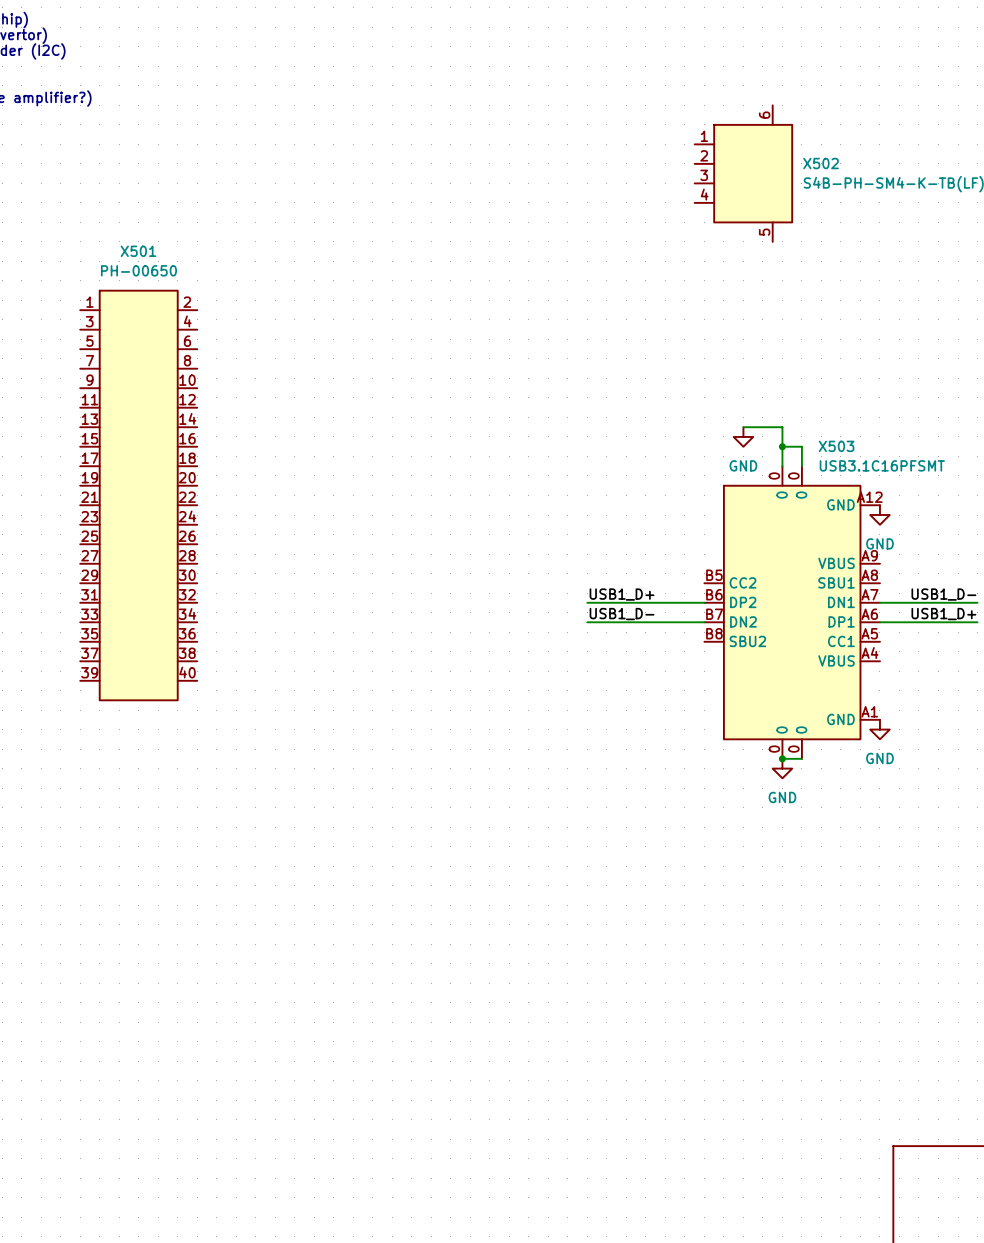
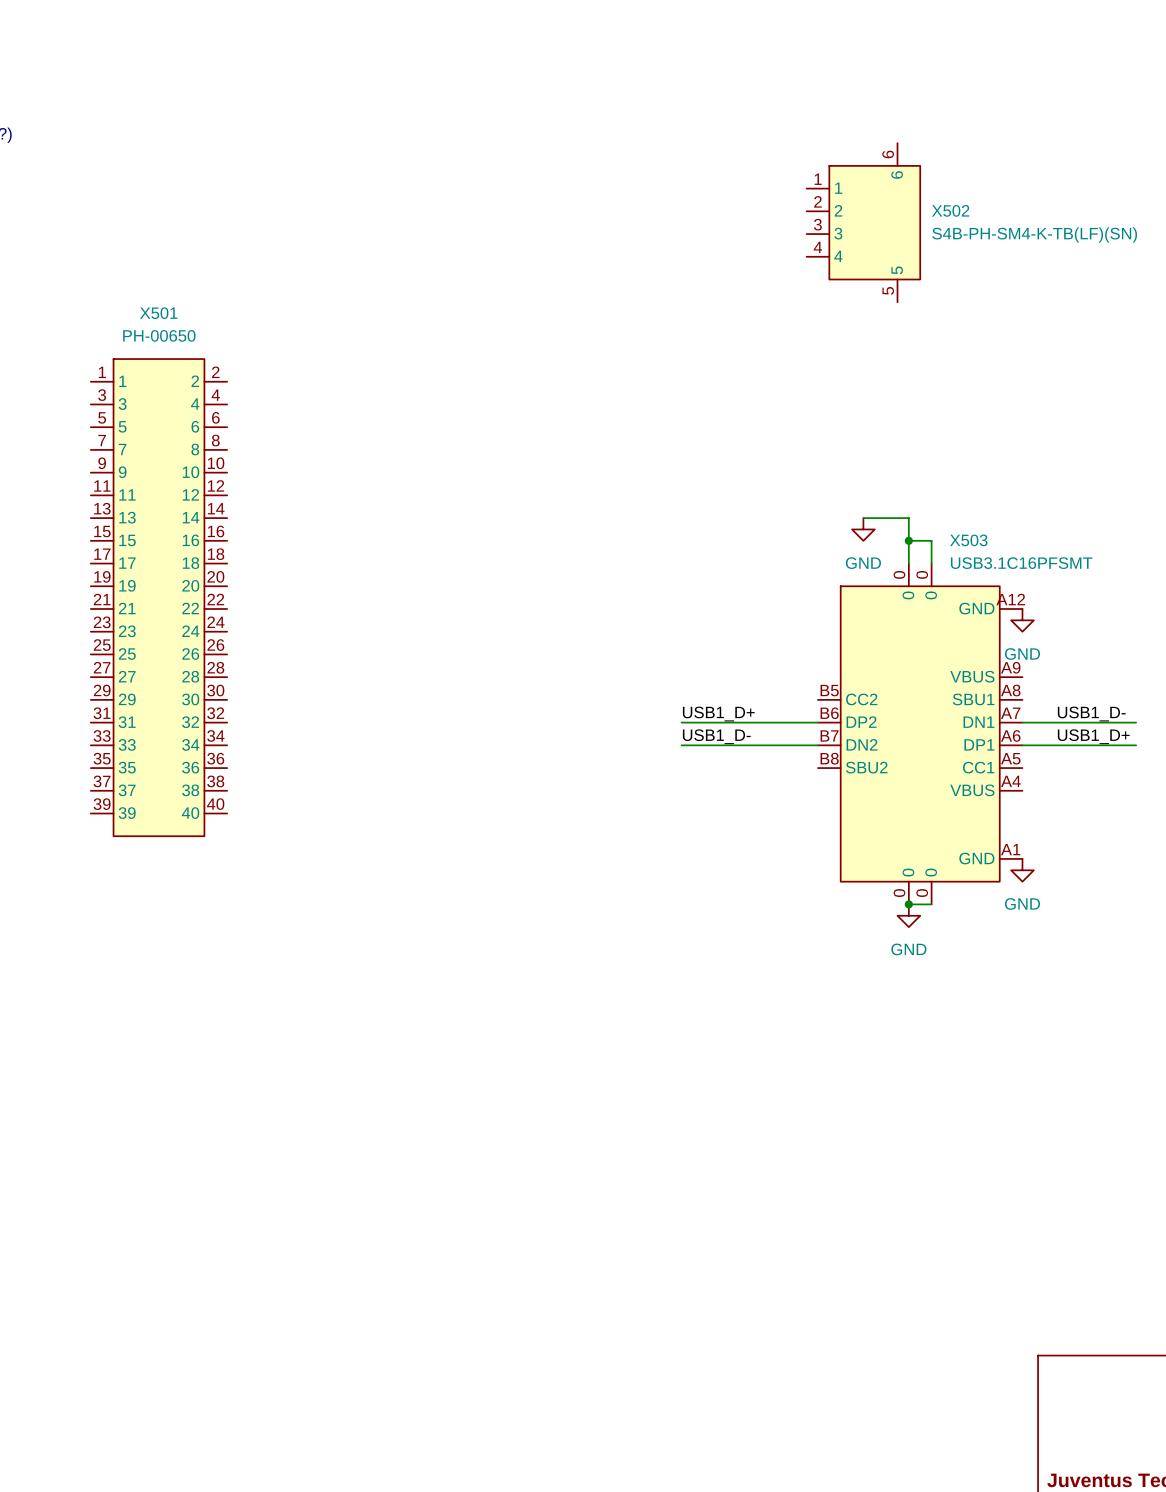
X502 pin name: none -> 6 (897, 174)
X502 pin name: none -> 1 (838, 188)
X502 pin name: none -> 2 (838, 210)
X502 pin name: none -> 3 (838, 233)
X502 pin name: none -> 4 (838, 256)
X502 pin name: none -> 5 (897, 270)
X501 symbol: [80, 290, 198, 701] -> [90, 359, 228, 837]

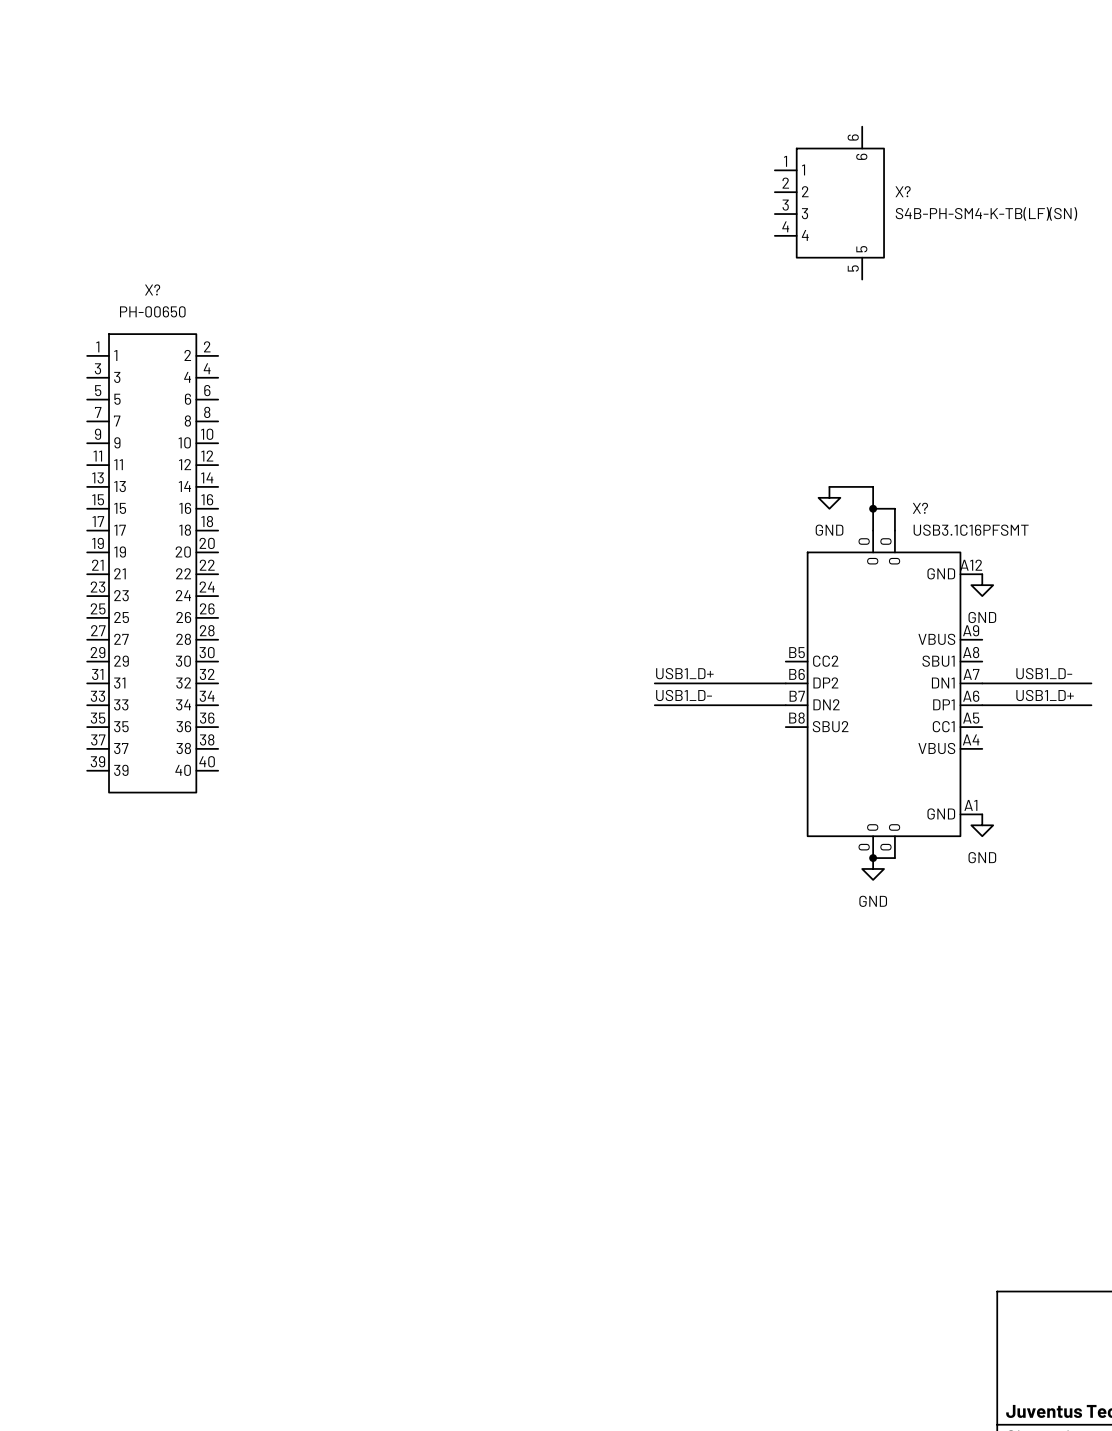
X502 name: X502 (950, 210) -> X? (903, 191)
X501 name: X501 (158, 313) -> X? (152, 289)
X503 name: X503 (968, 540) -> X? (920, 508)

